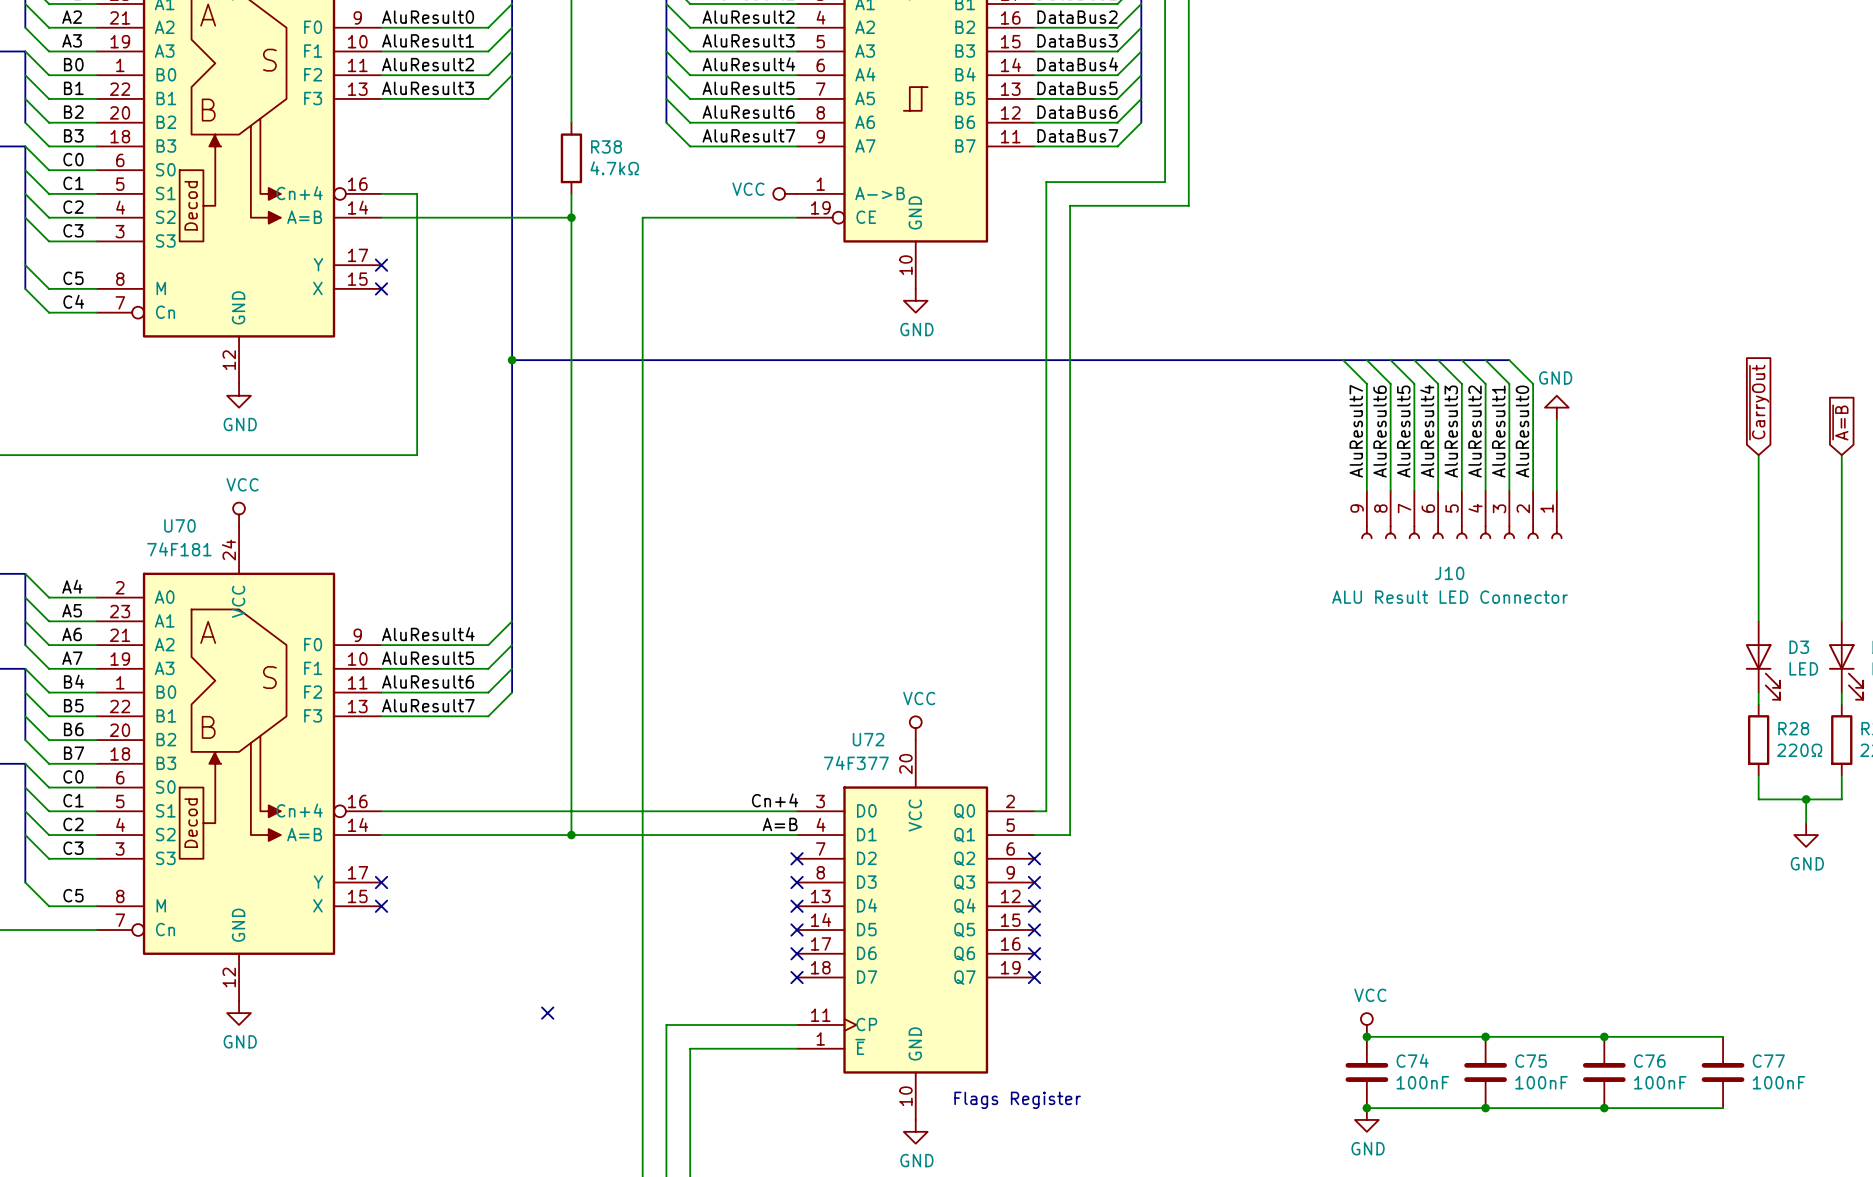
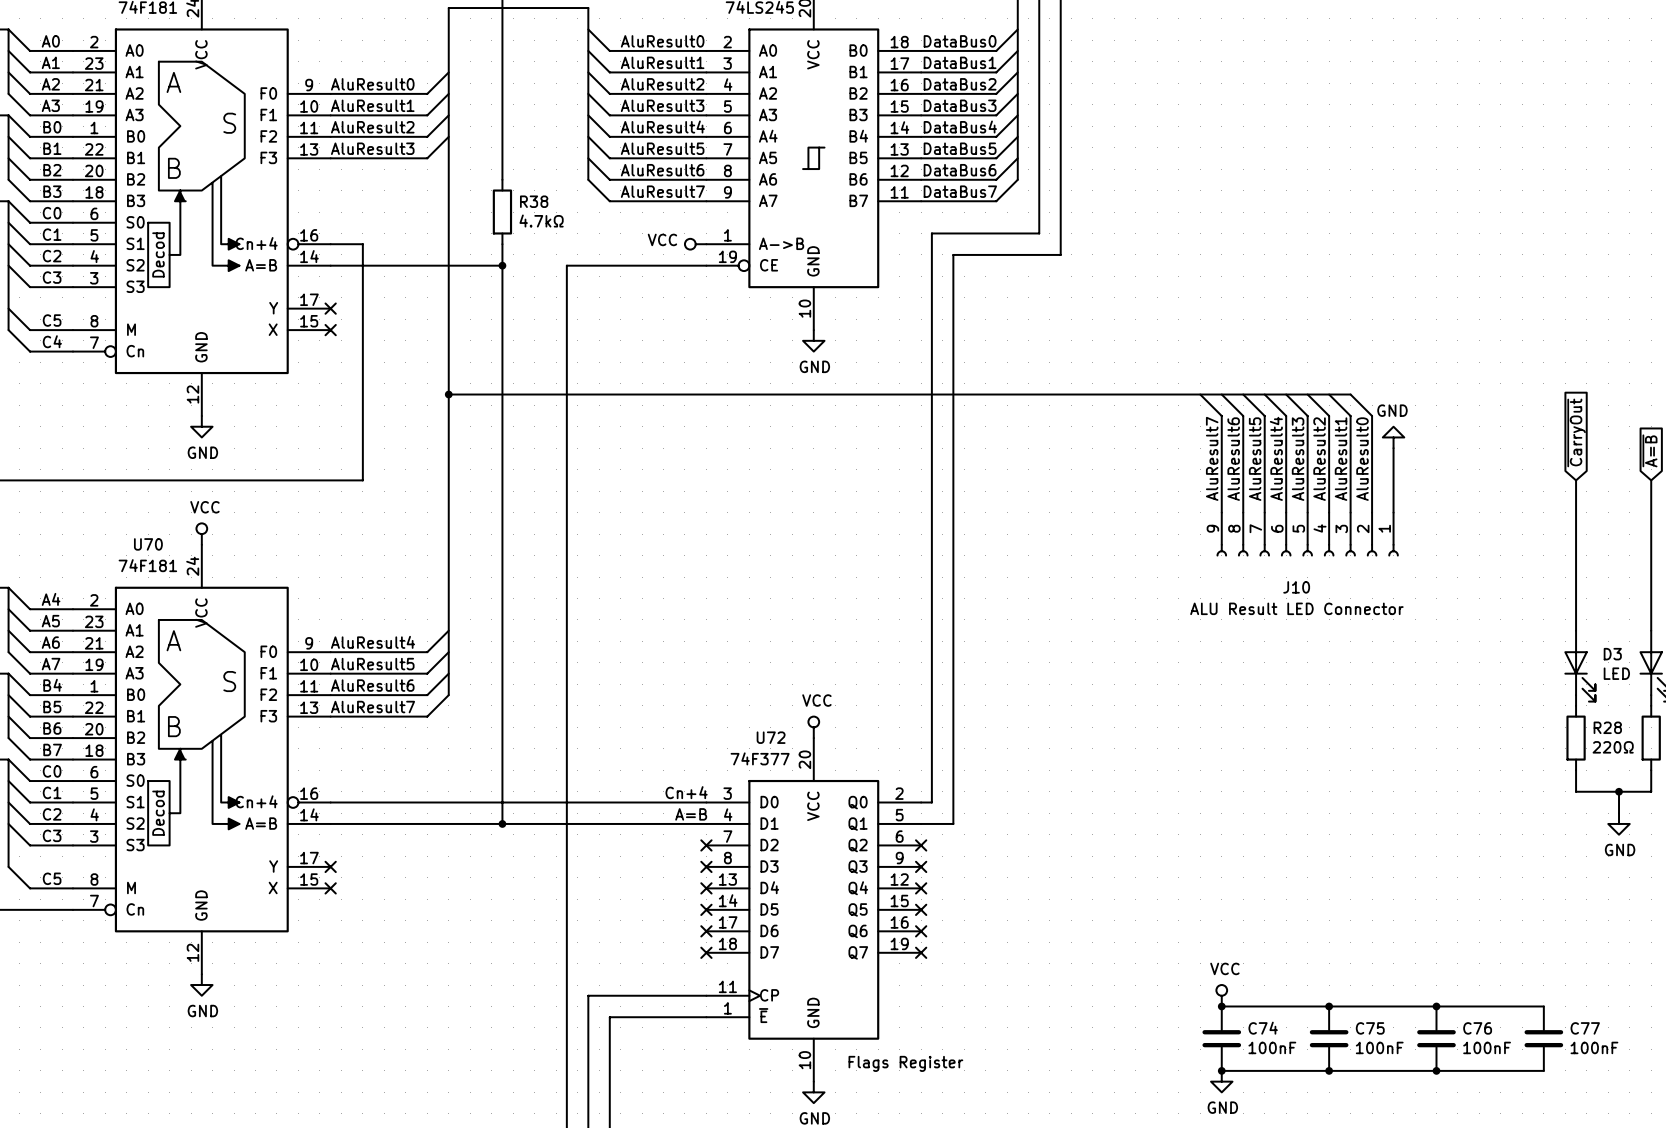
no-connect mark: (547, 1013) -> none

